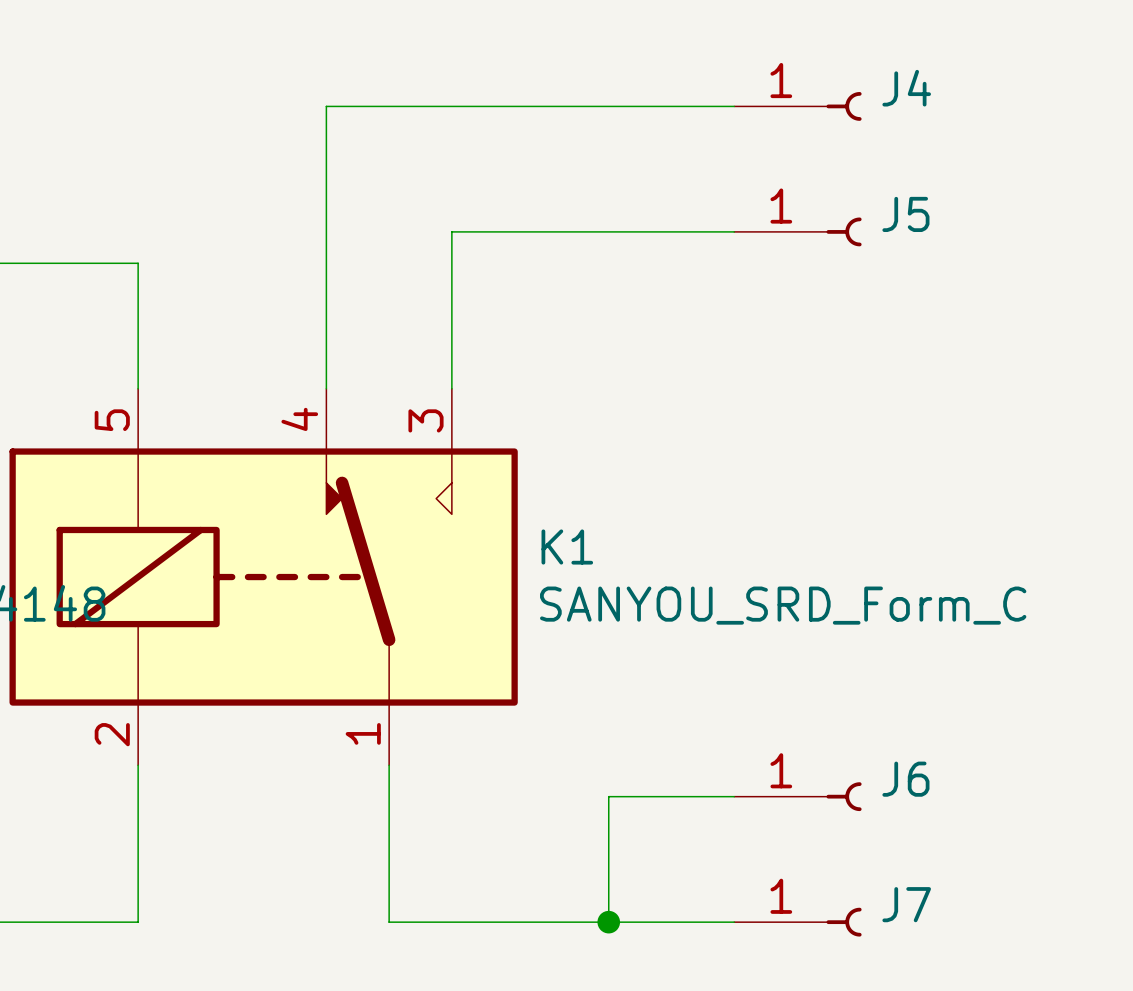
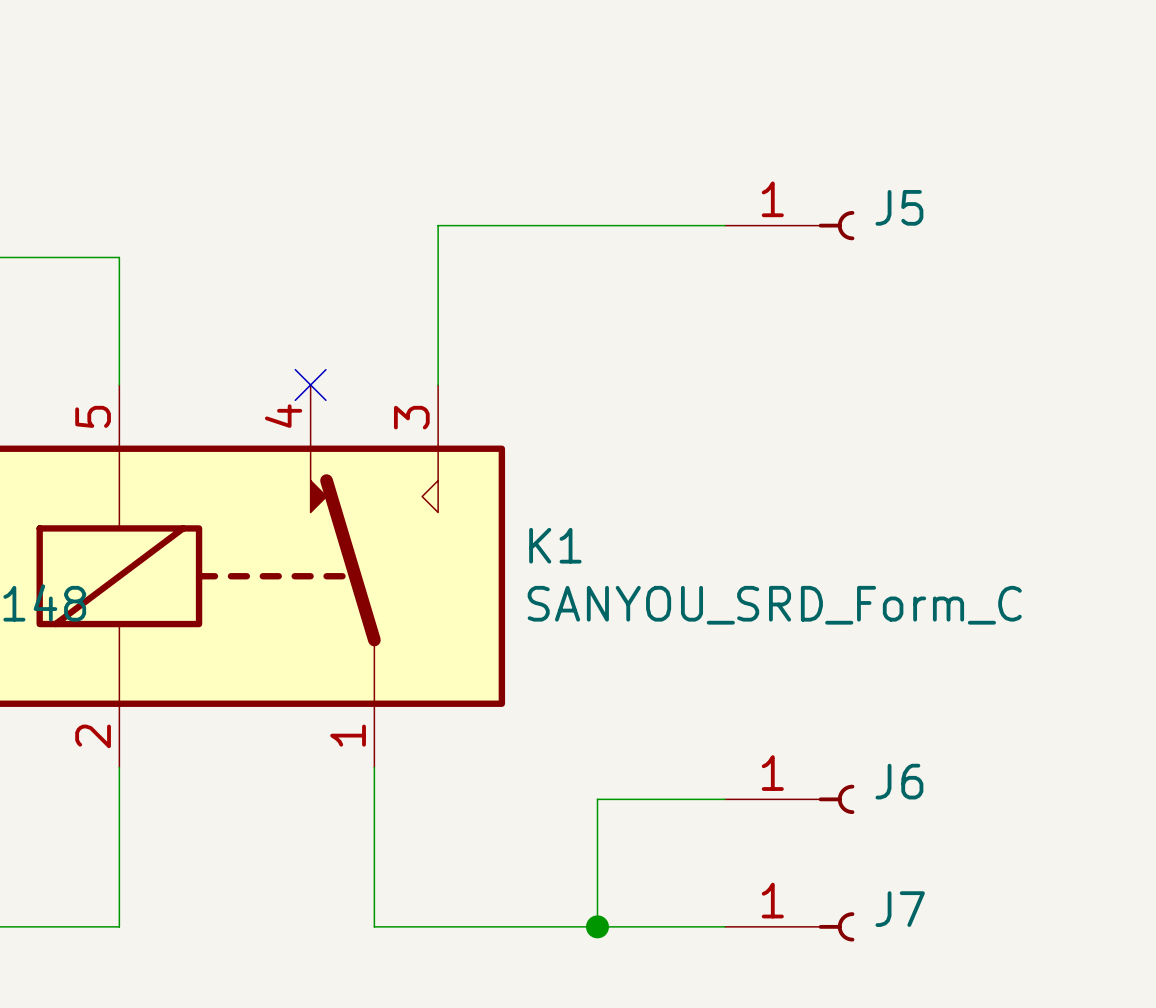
wire: (734, 106) (326, 106) (326, 388) -> none
J4: (797, 106) -> none
no-connect mark: none -> (310, 384)

